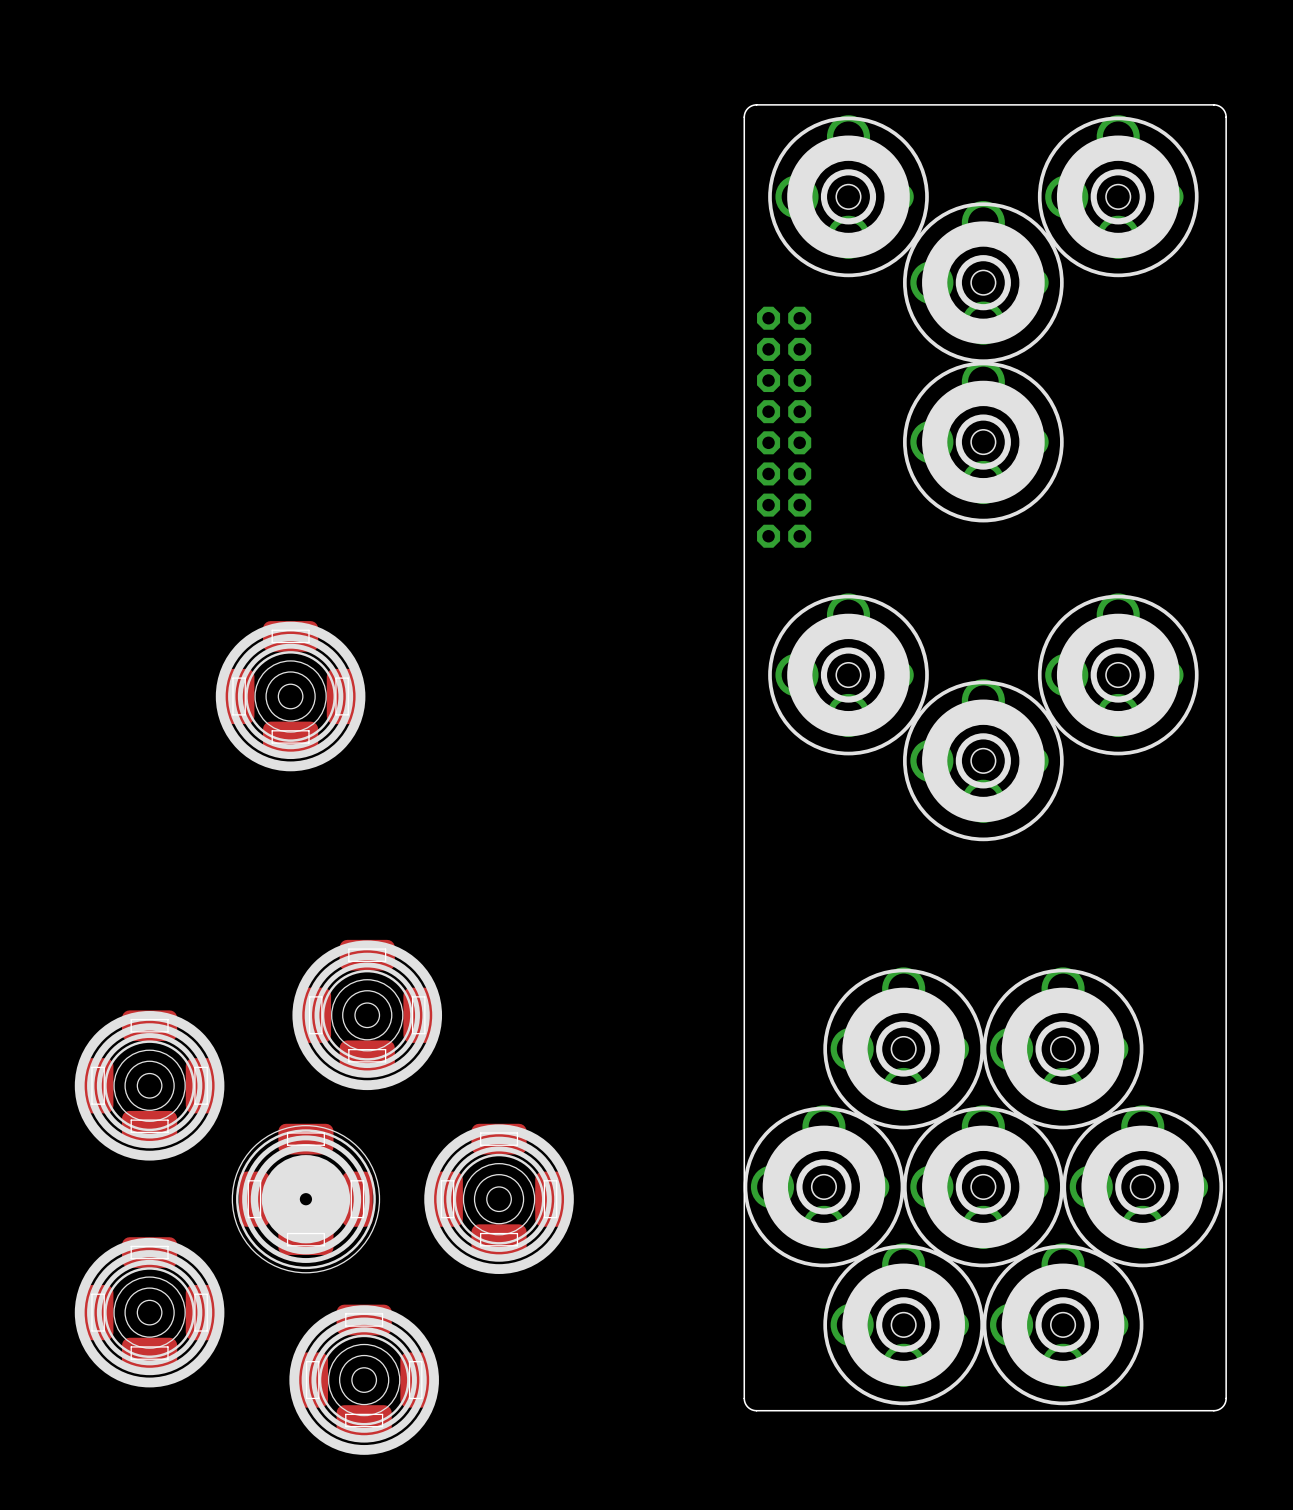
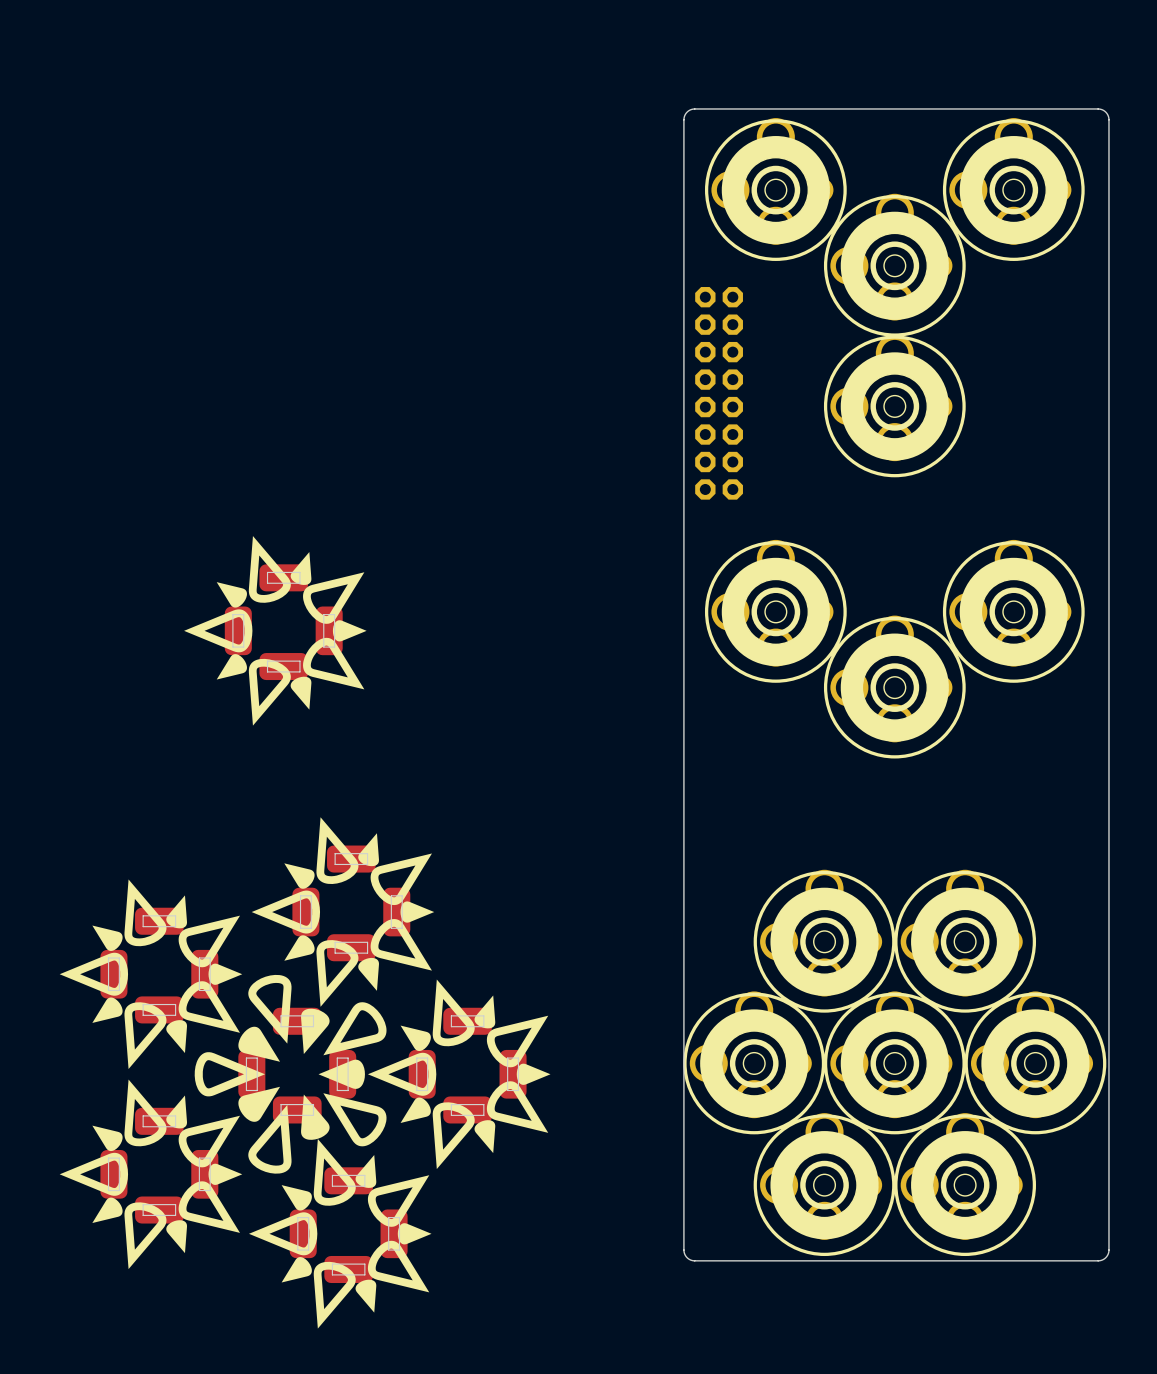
part footprint: [215, 621, 366, 772] -> [184, 536, 367, 726]
part footprint: [292, 939, 443, 1091] -> [251, 817, 435, 1007]
part footprint: [74, 1010, 225, 1161] -> [59, 879, 243, 1070]
part footprint: [231, 1123, 381, 1274] -> [194, 974, 387, 1174]
part footprint: [424, 1123, 574, 1274] -> [367, 979, 551, 1170]
part footprint: [74, 1237, 225, 1388] -> [59, 1079, 243, 1270]
part footprint: [289, 1304, 439, 1455] -> [248, 1139, 432, 1329]

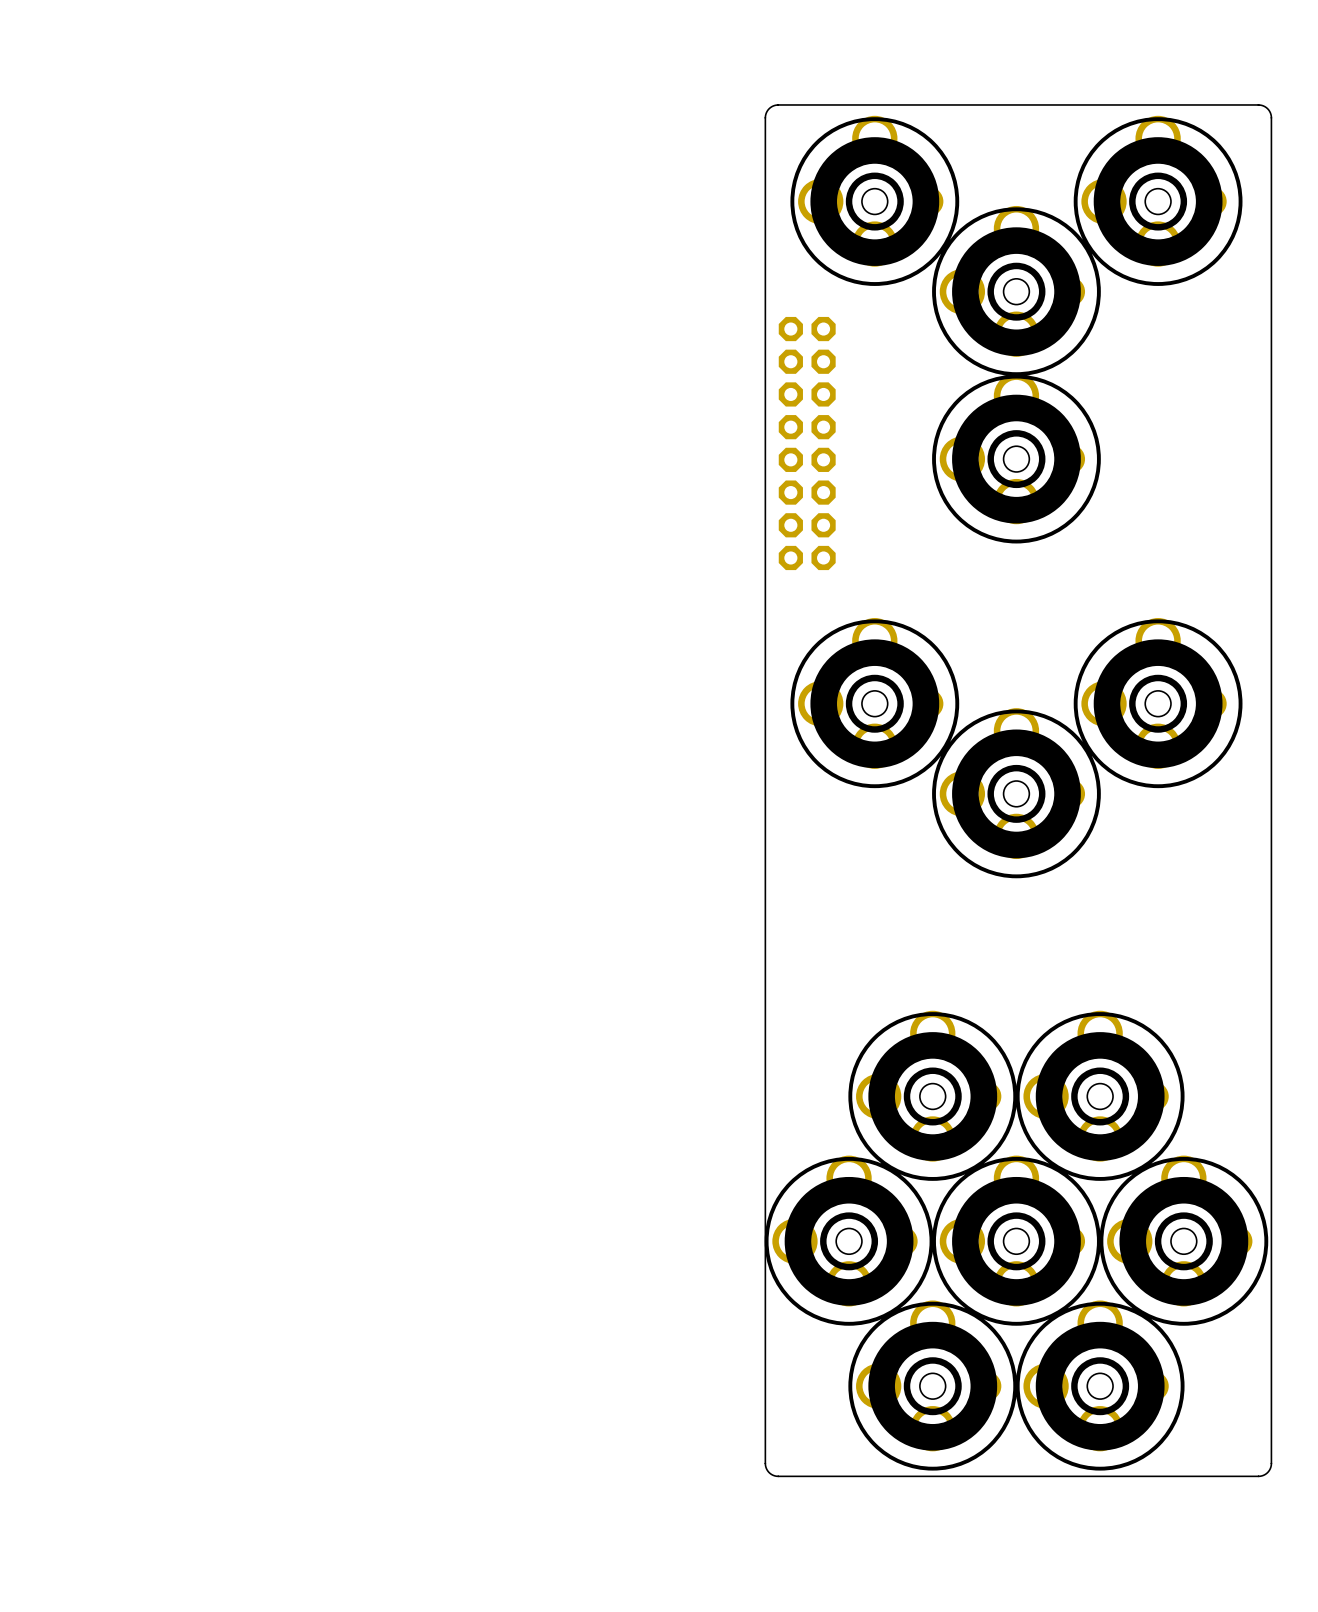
part: (275, 630) -> none
part: (342, 912) -> none
part: (150, 974) -> none
part: (290, 1074) -> none
part: (459, 1074) -> none
part: (150, 1174) -> none
part: (340, 1233) -> none

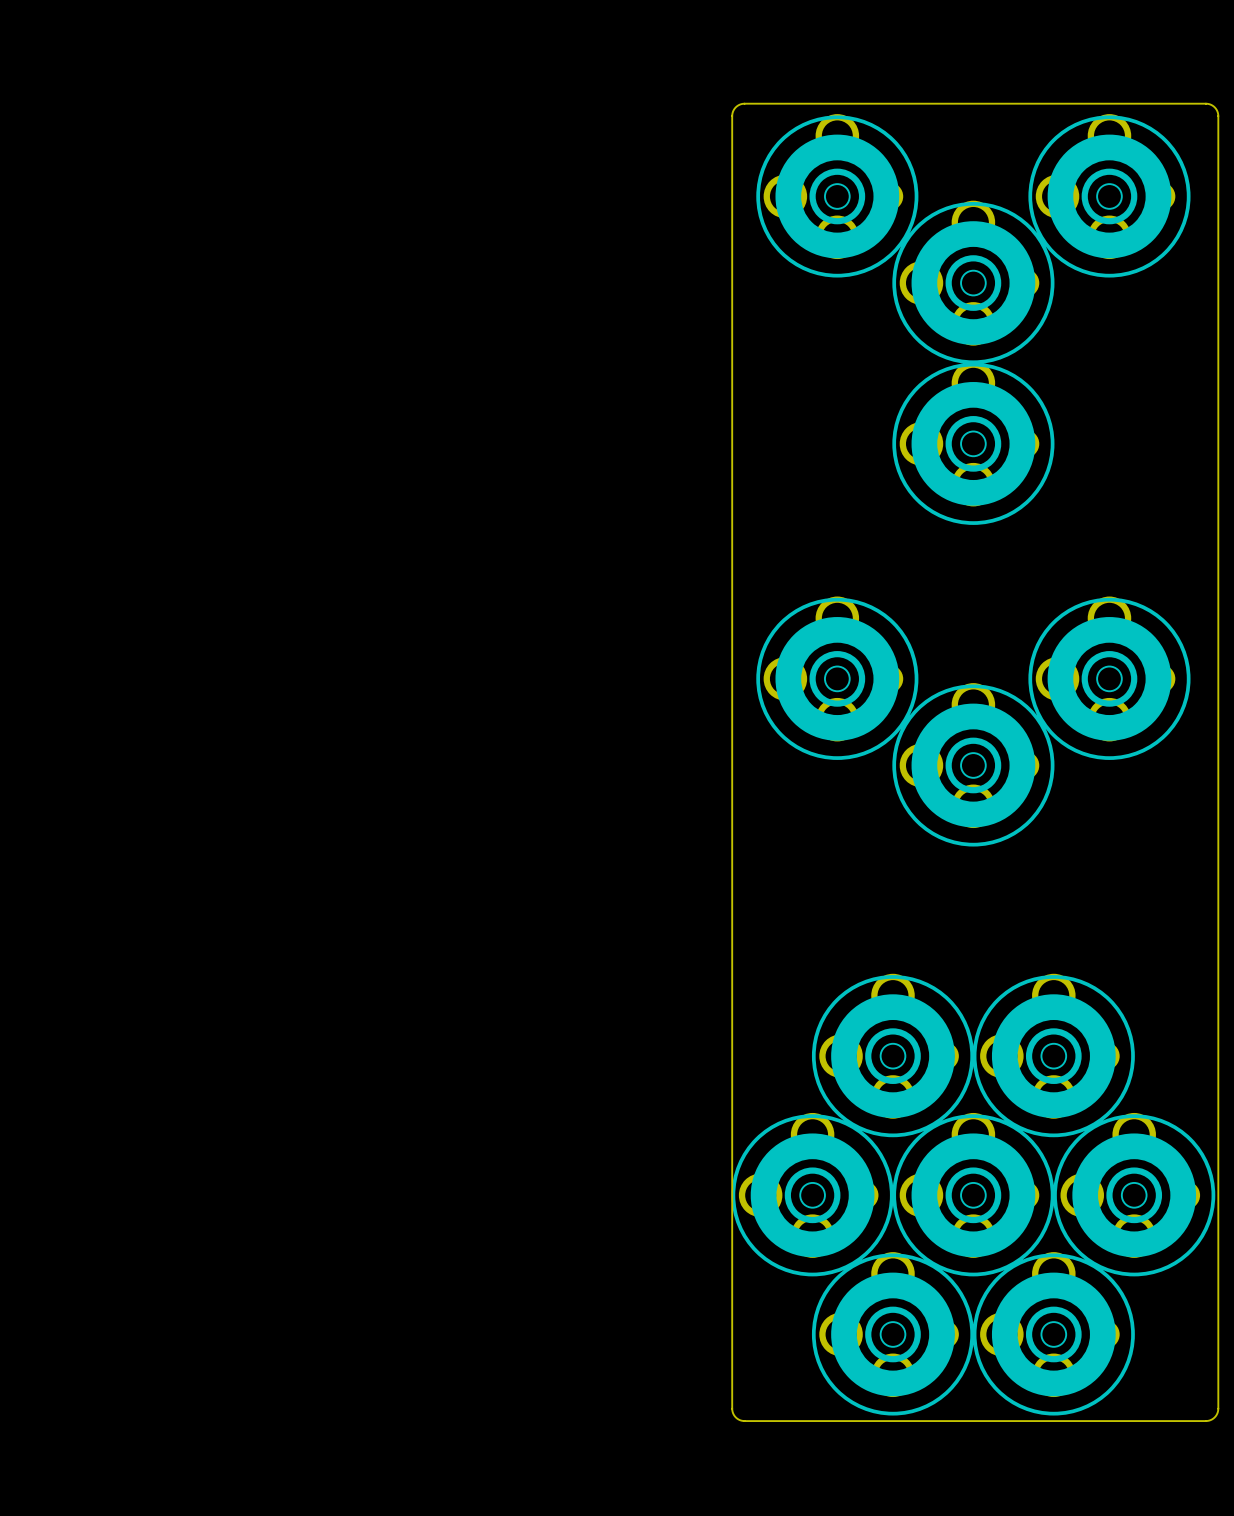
part: (807, 443) -> none

